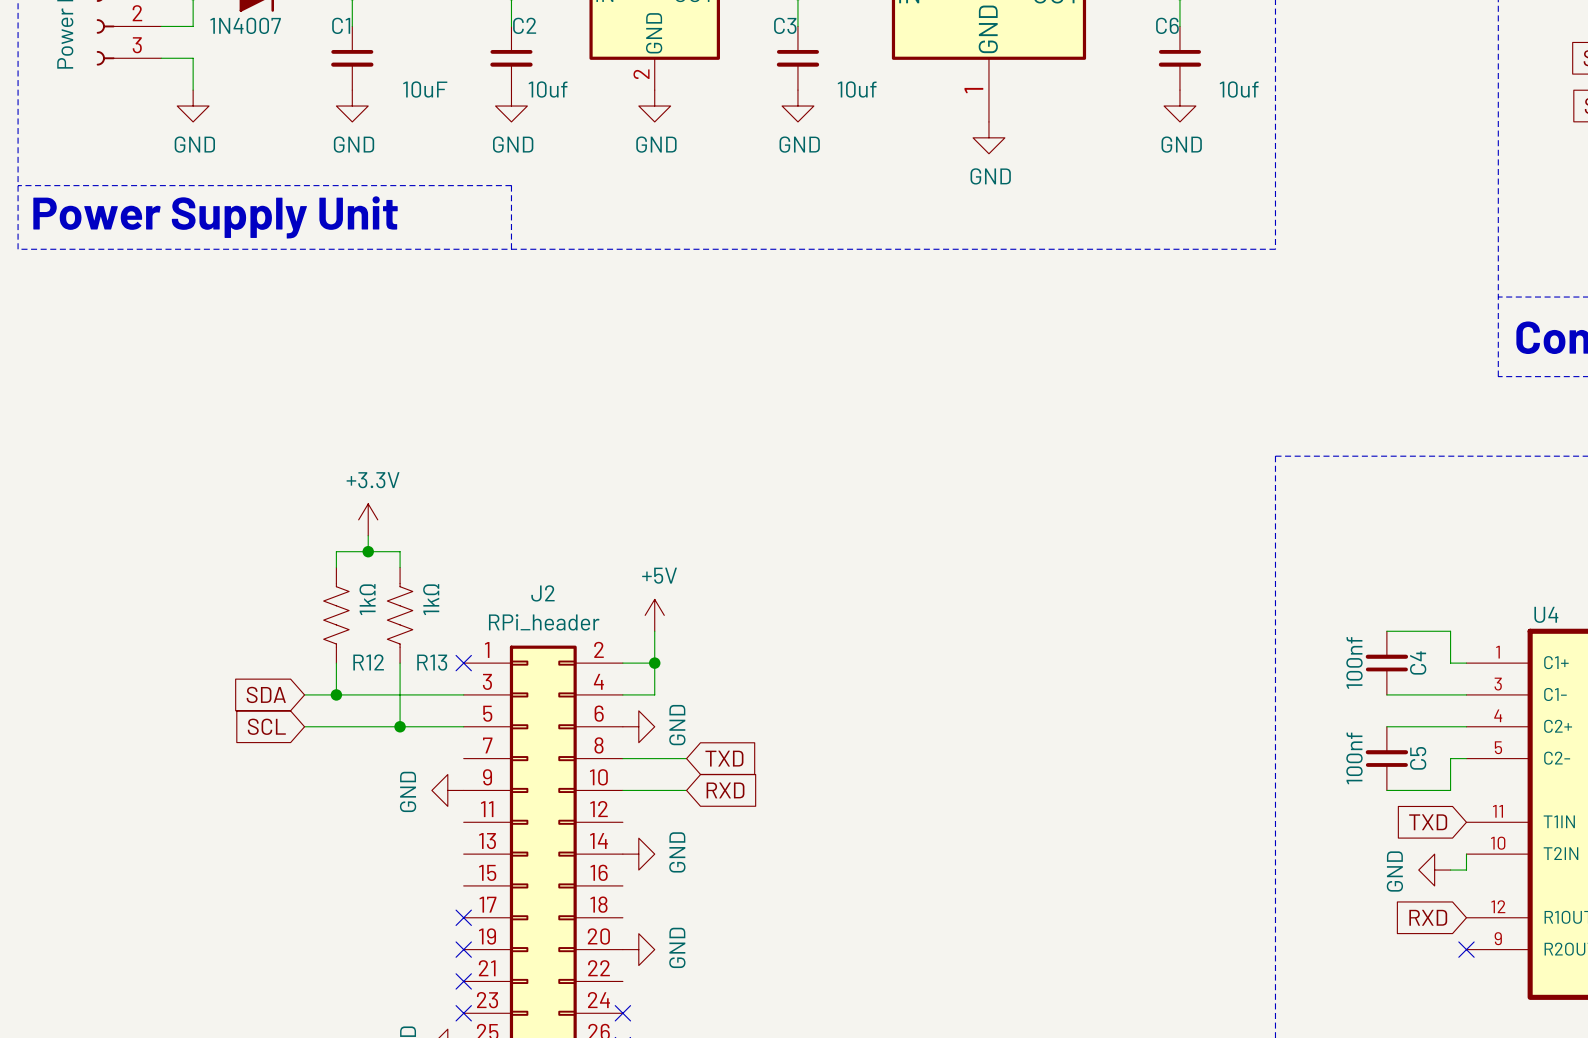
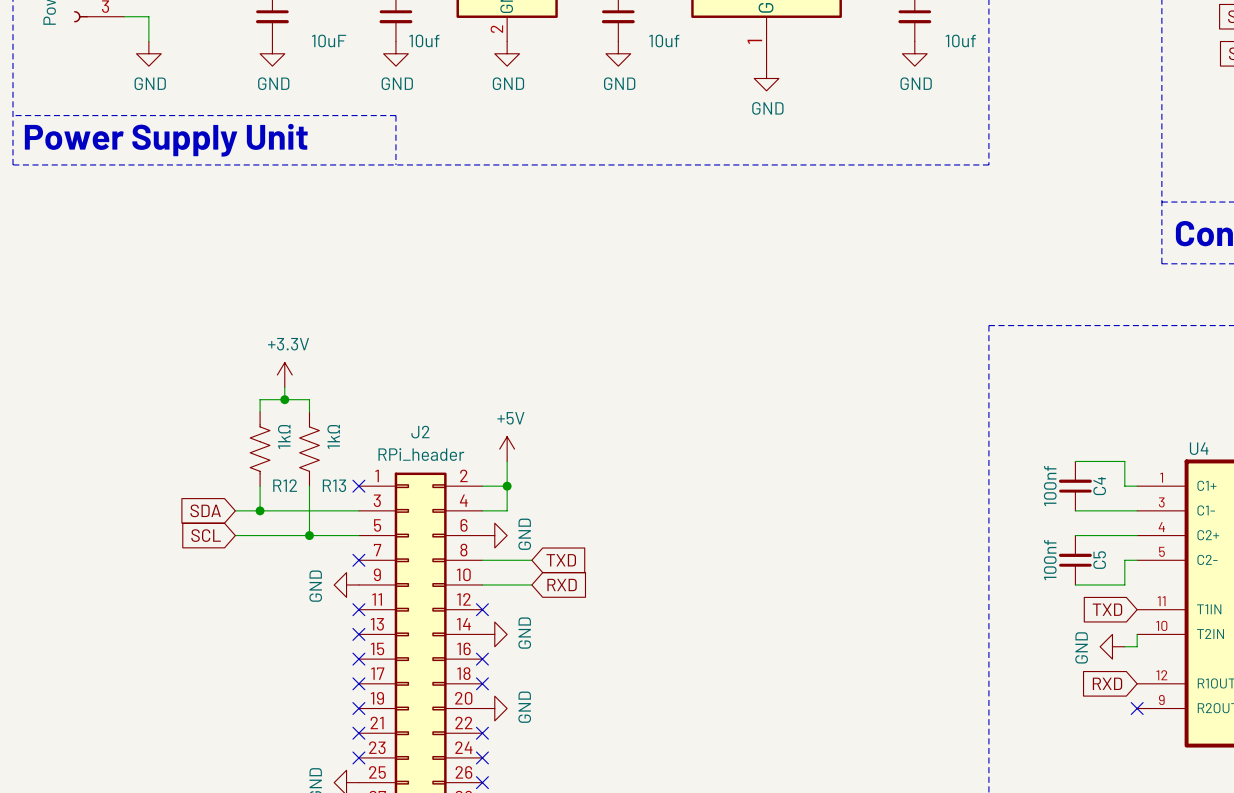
no-connect mark: none -> (358, 560)
no-connect mark: none -> (358, 609)
no-connect mark: none -> (482, 609)
no-connect mark: none -> (358, 634)
no-connect mark: none -> (358, 659)
no-connect mark: none -> (482, 659)
no-connect mark: none -> (482, 683)
no-connect mark: none -> (482, 733)

